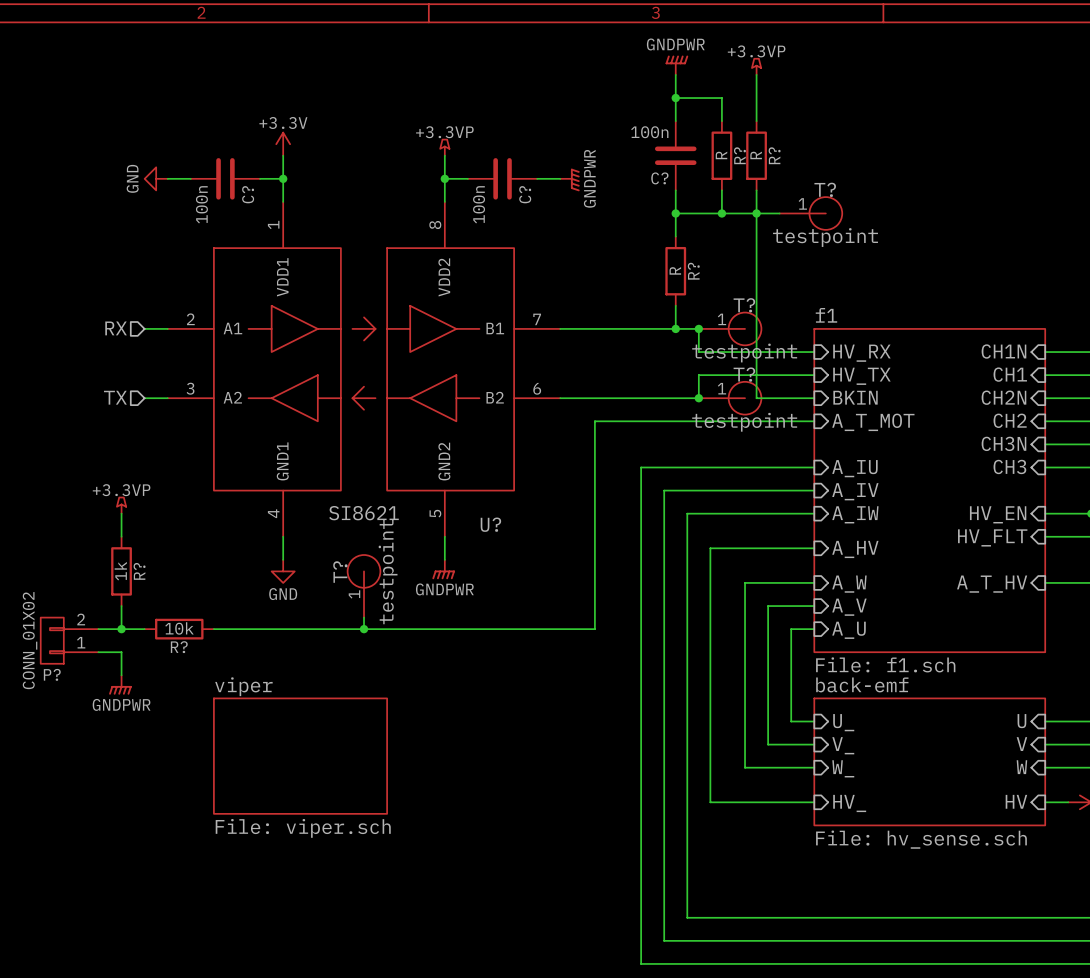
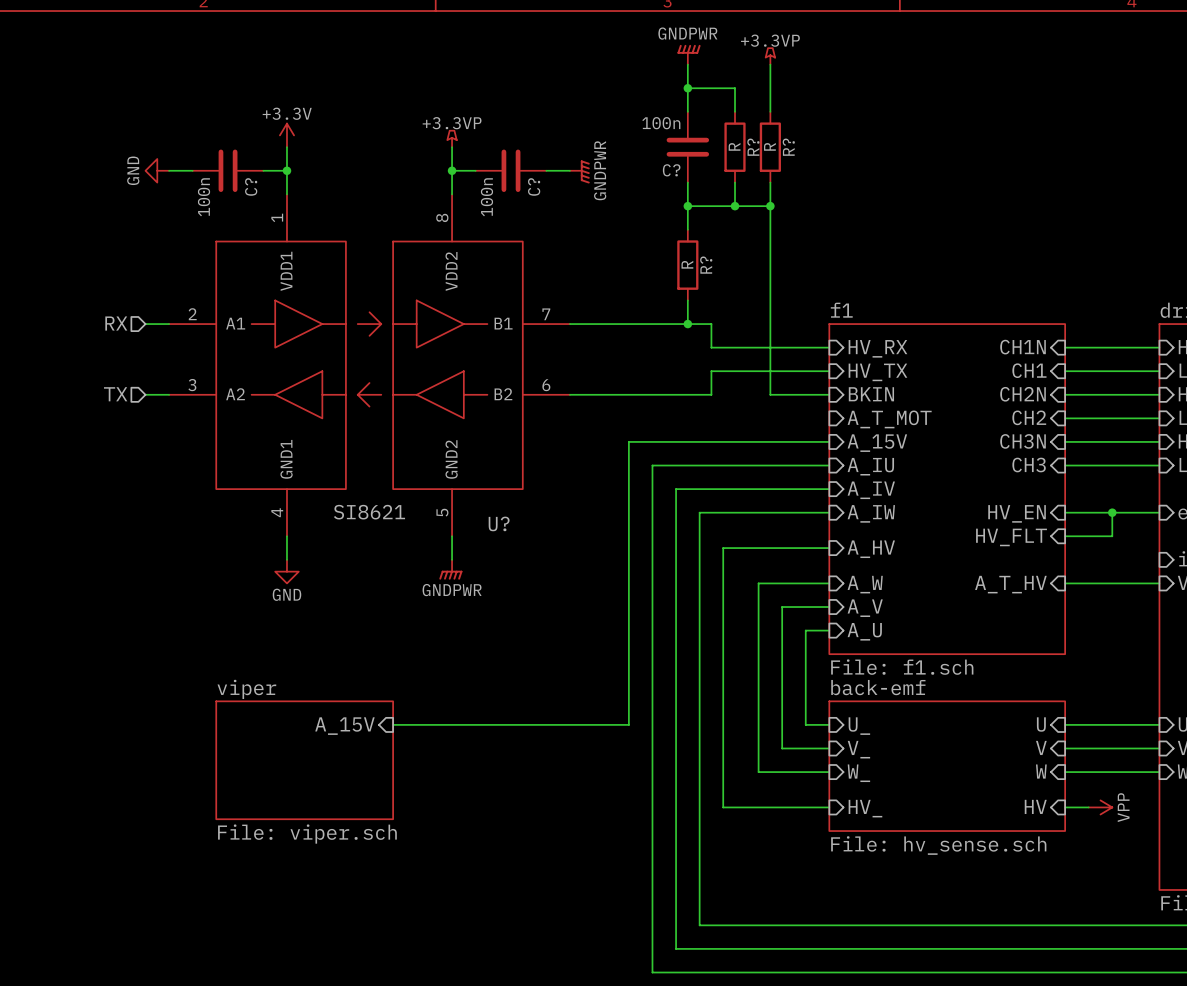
wire: (756, 213) (779, 213) -> none
T?: testpoint (810, 213) -> none
junction: (698, 328) -> none
T?: testpoint (730, 328) -> none
junction: (698, 398) -> none
T?: testpoint (730, 398) -> none
wire: (814, 421) (594, 421) (594, 629) (213, 629) -> none
wire: none -> (829, 441) (628, 441) (628, 724) (393, 724)
sheet pin: none -> A_15V (877, 443)
power symbol: +3.3VP (121, 505) -> none
wire: (121, 513) (121, 536) -> none
R?: 1k (121, 571) -> none
T?: testpoint (364, 586) -> none
wire: (121, 606) (121, 629) -> none
wire: (364, 617) (364, 629) -> none
wire: (98, 629) (144, 629) -> none
junction: (121, 629) -> none
R?: 10k (179, 629) -> none
junction: (364, 629) -> none
P?: CONN_01X02 (69, 640) -> none
wire: (98, 652) (121, 652) (121, 675) -> none
power symbol: GNDPWR (120, 685) -> none
sheet pin: none -> A_15V (344, 726)

